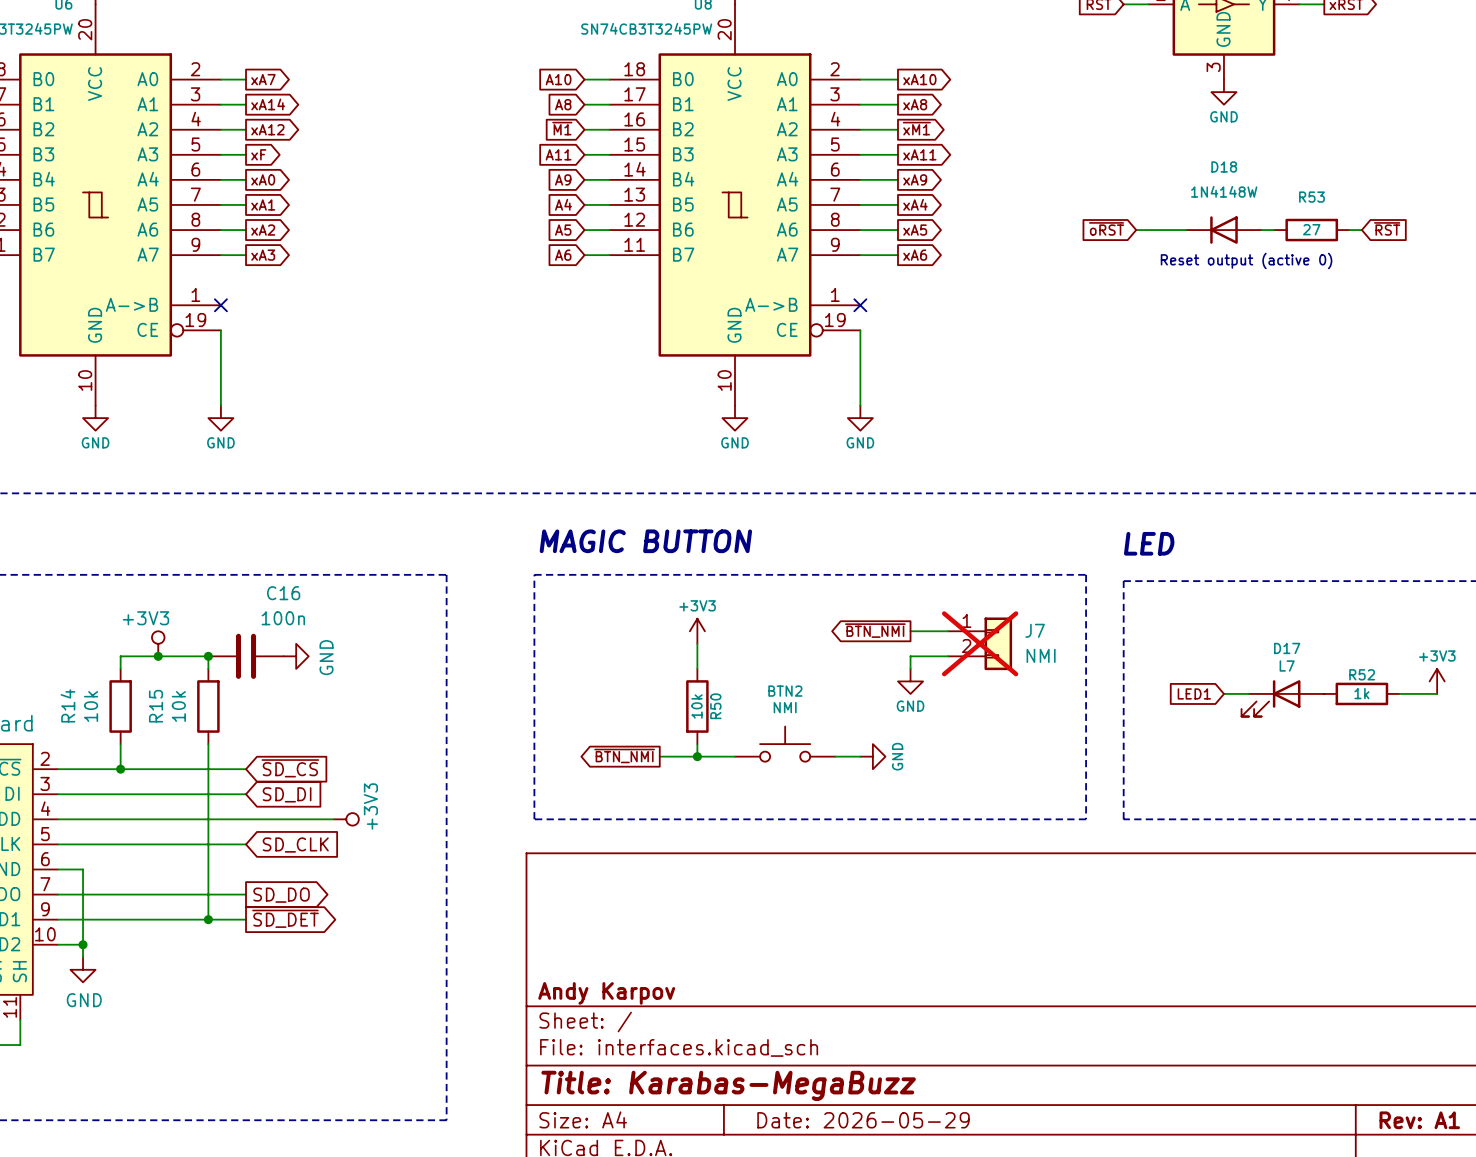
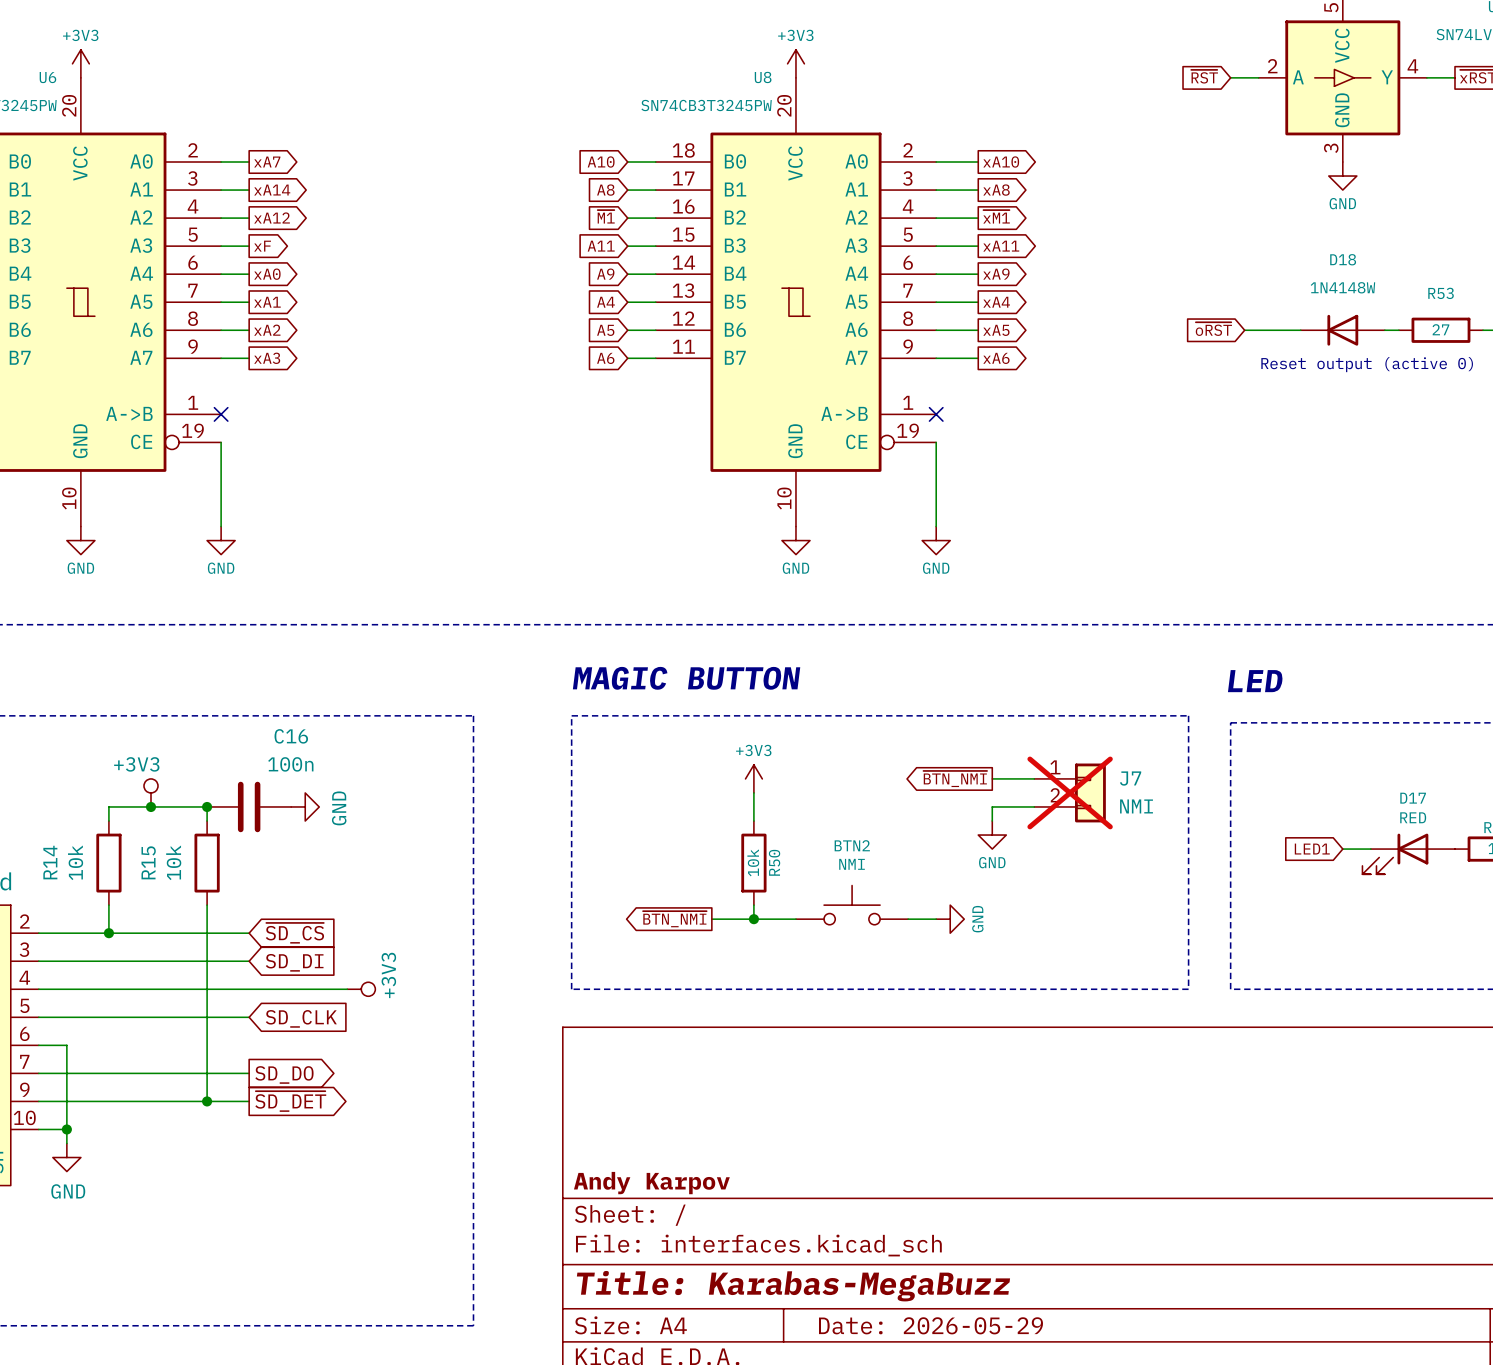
D17 value: L7 (1287, 666) -> RED (1413, 817)

